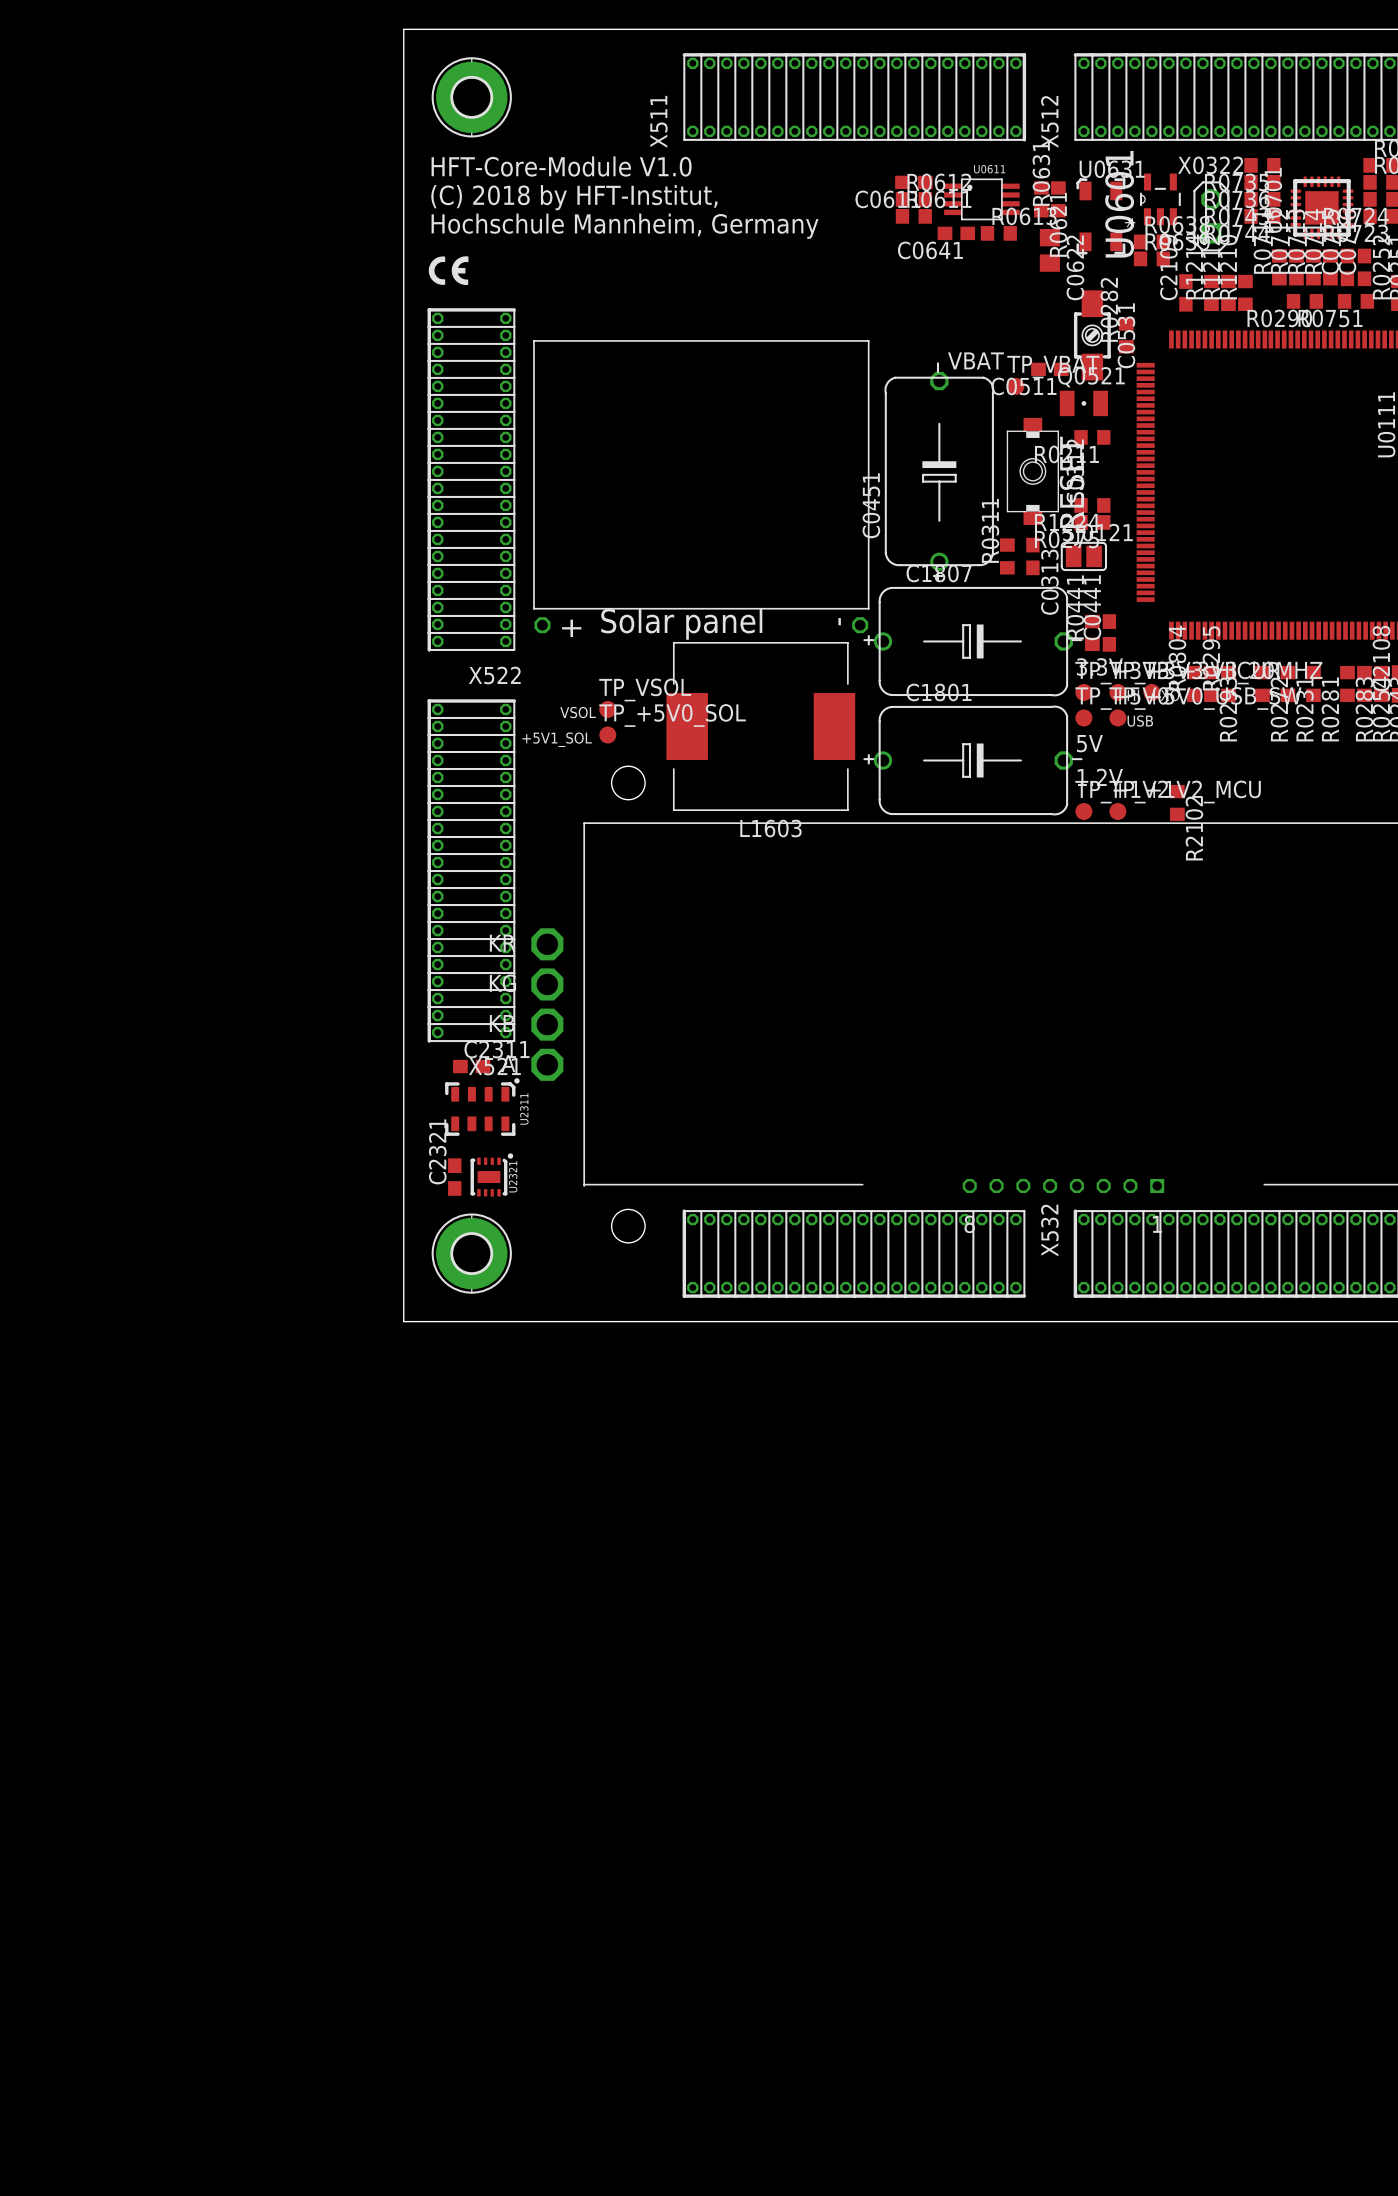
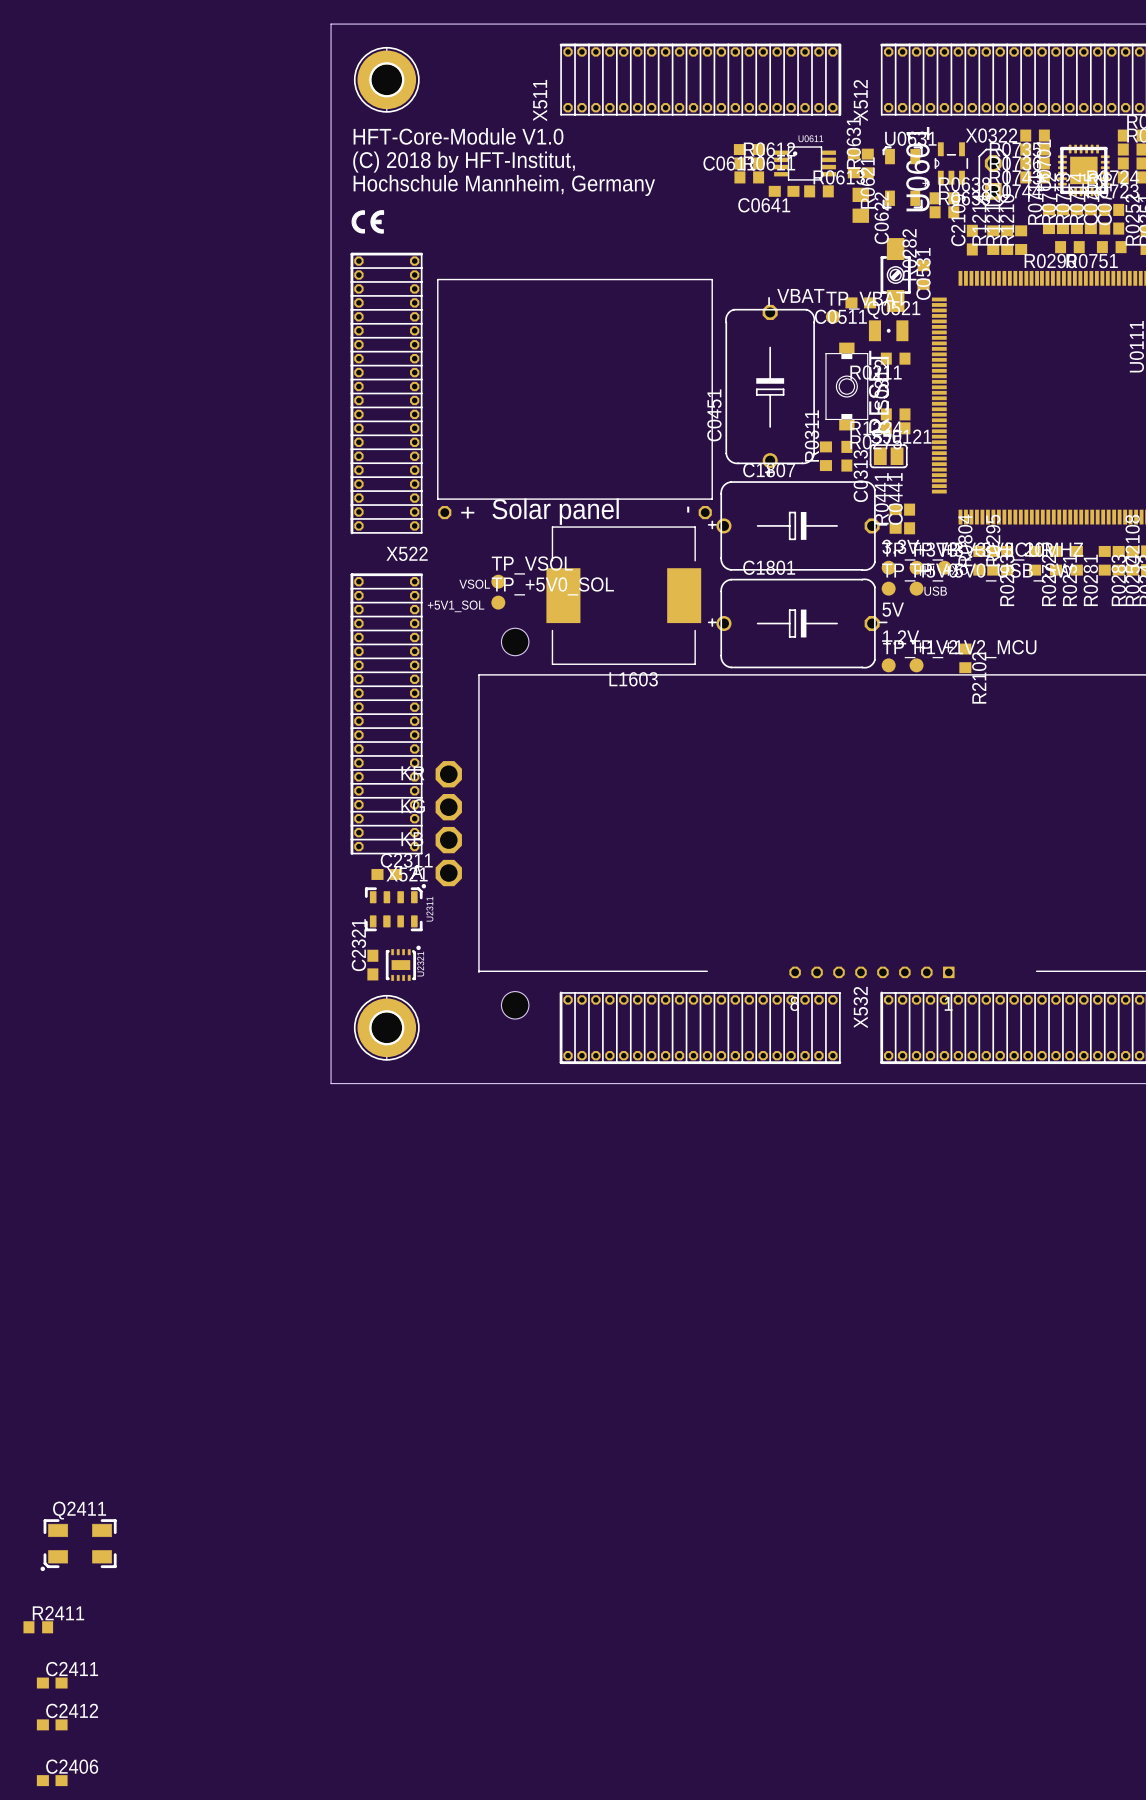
Q2411: none -> (78, 1545)
R2411: none -> (38, 1627)
C2411: none -> (52, 1683)
C2412: none -> (52, 1724)
C2406: none -> (52, 1780)

